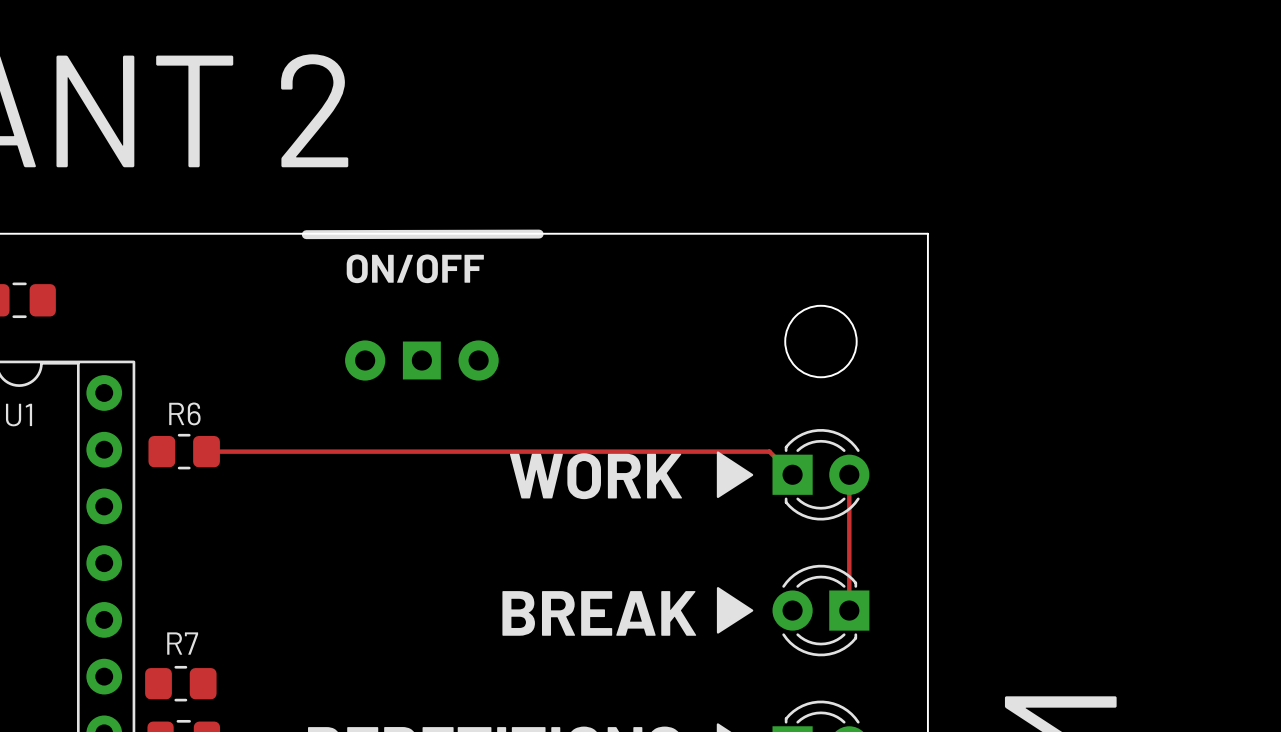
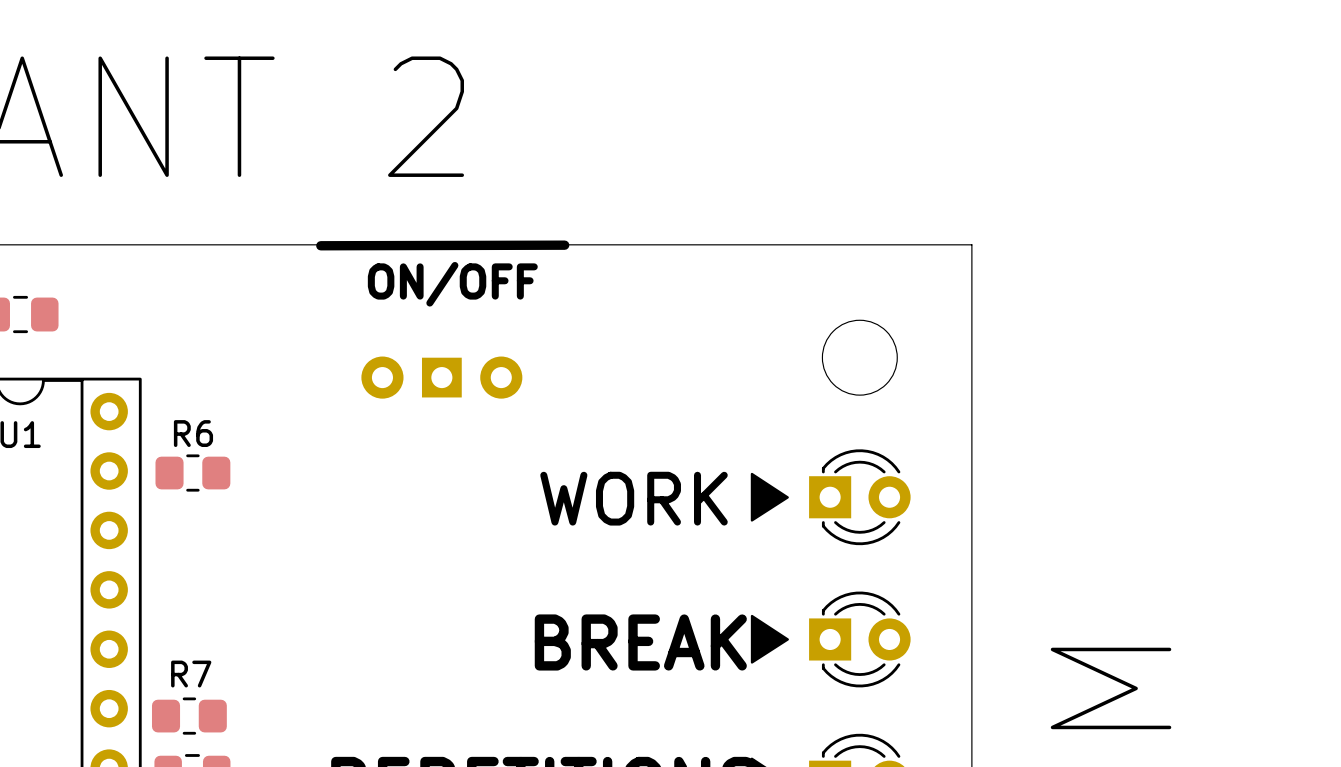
track: (206, 451) (769, 451) (792, 474) -> none
track: (849, 474) (849, 610) -> none
part rotation: 0° (820, 610) -> 180° (859, 639)

